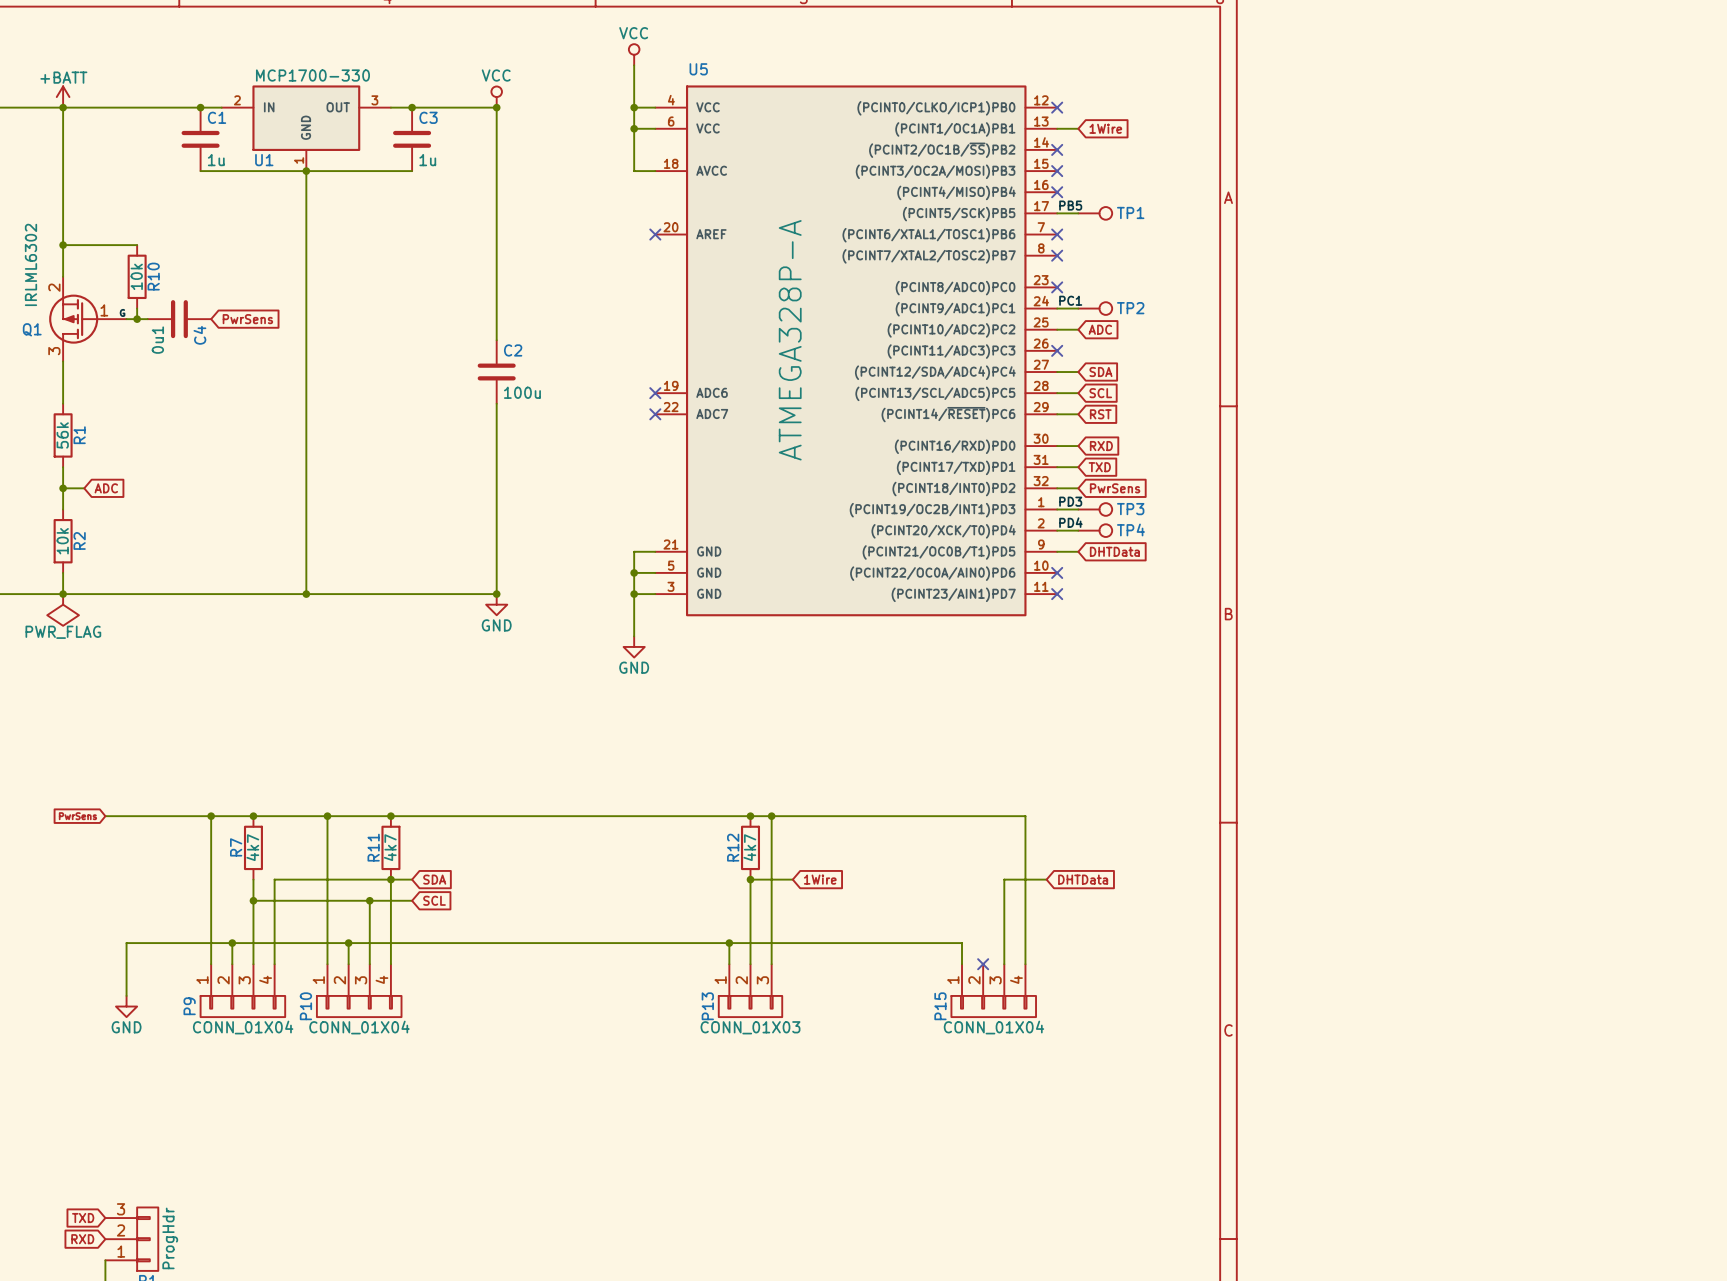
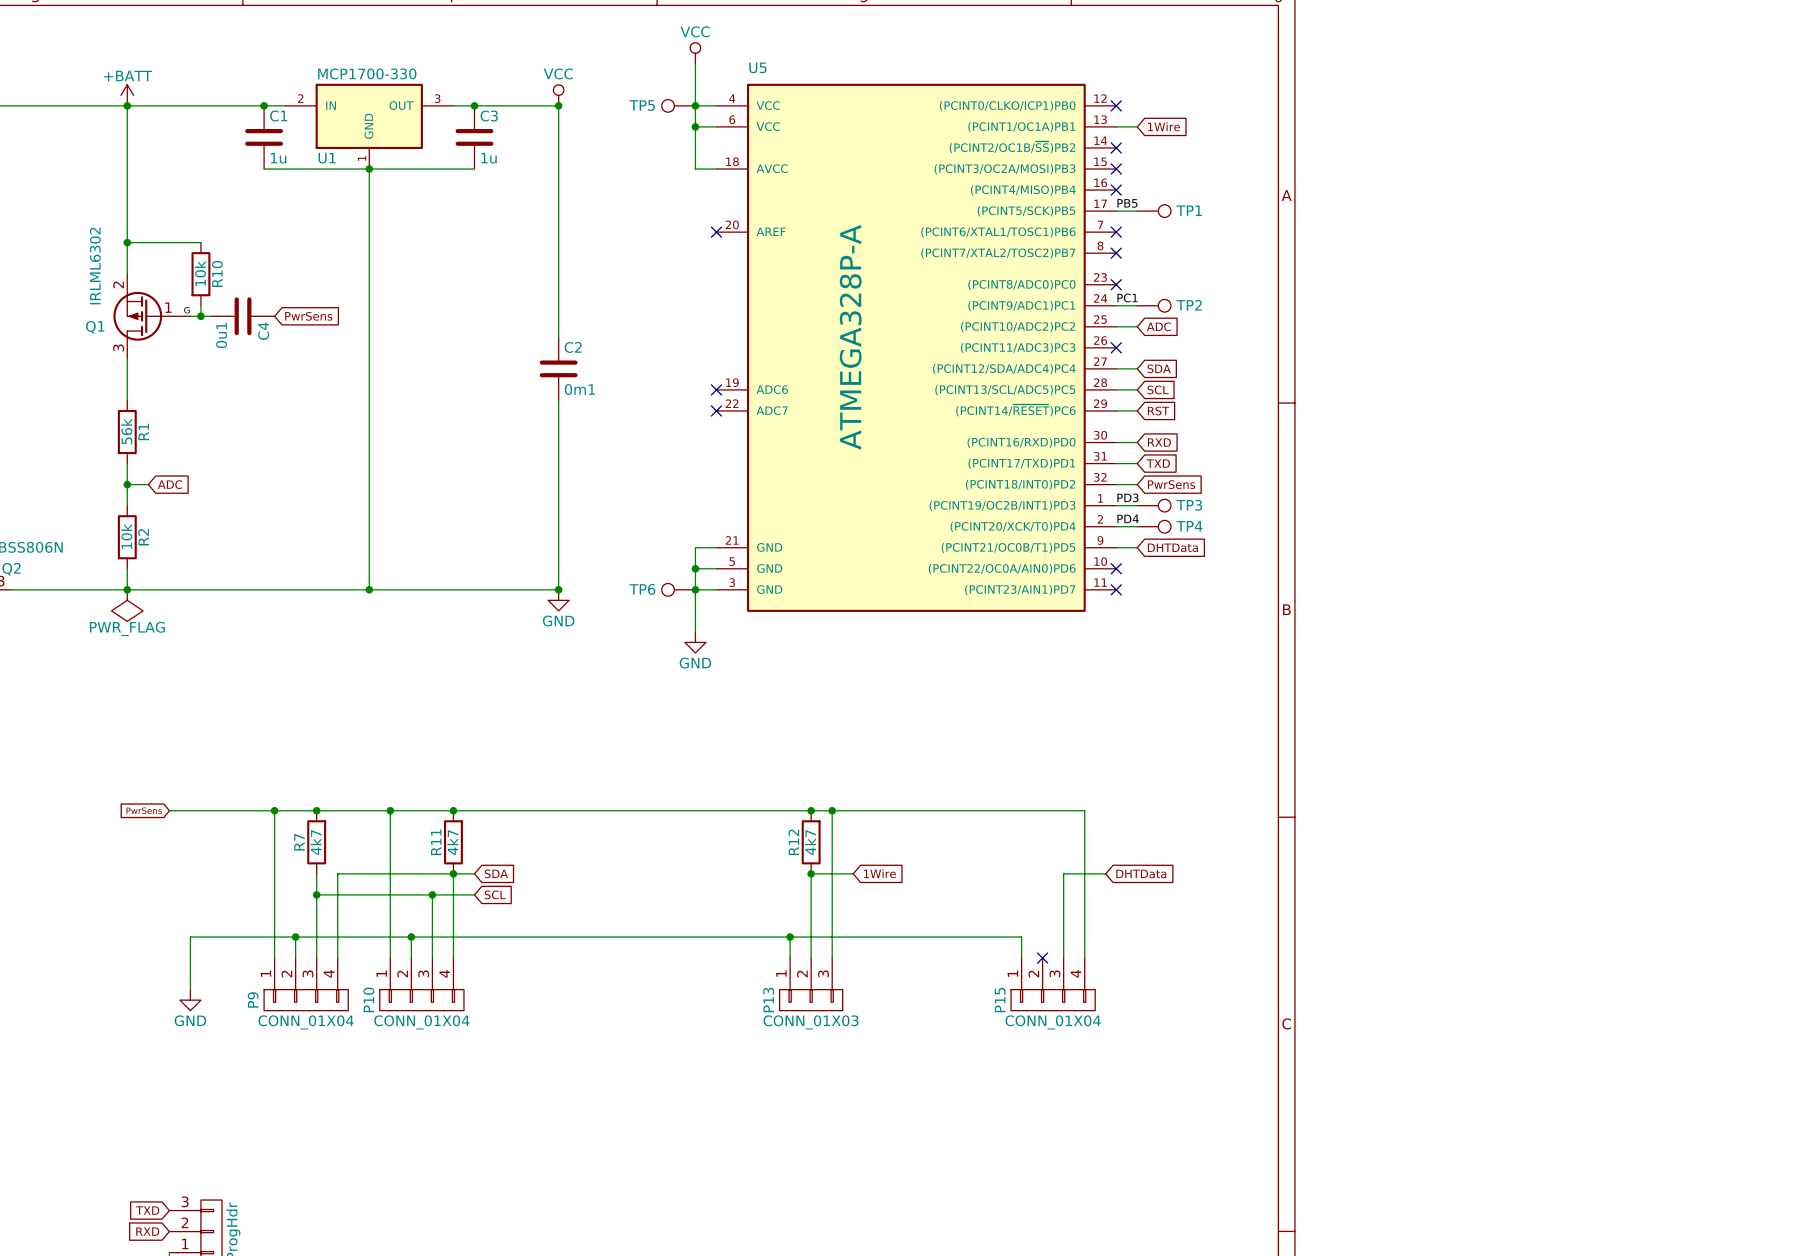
TP5: none -> (678, 105)
C2 value: 100u (522, 392) -> 0m1 (579, 389)
TP6: none -> (678, 589)

